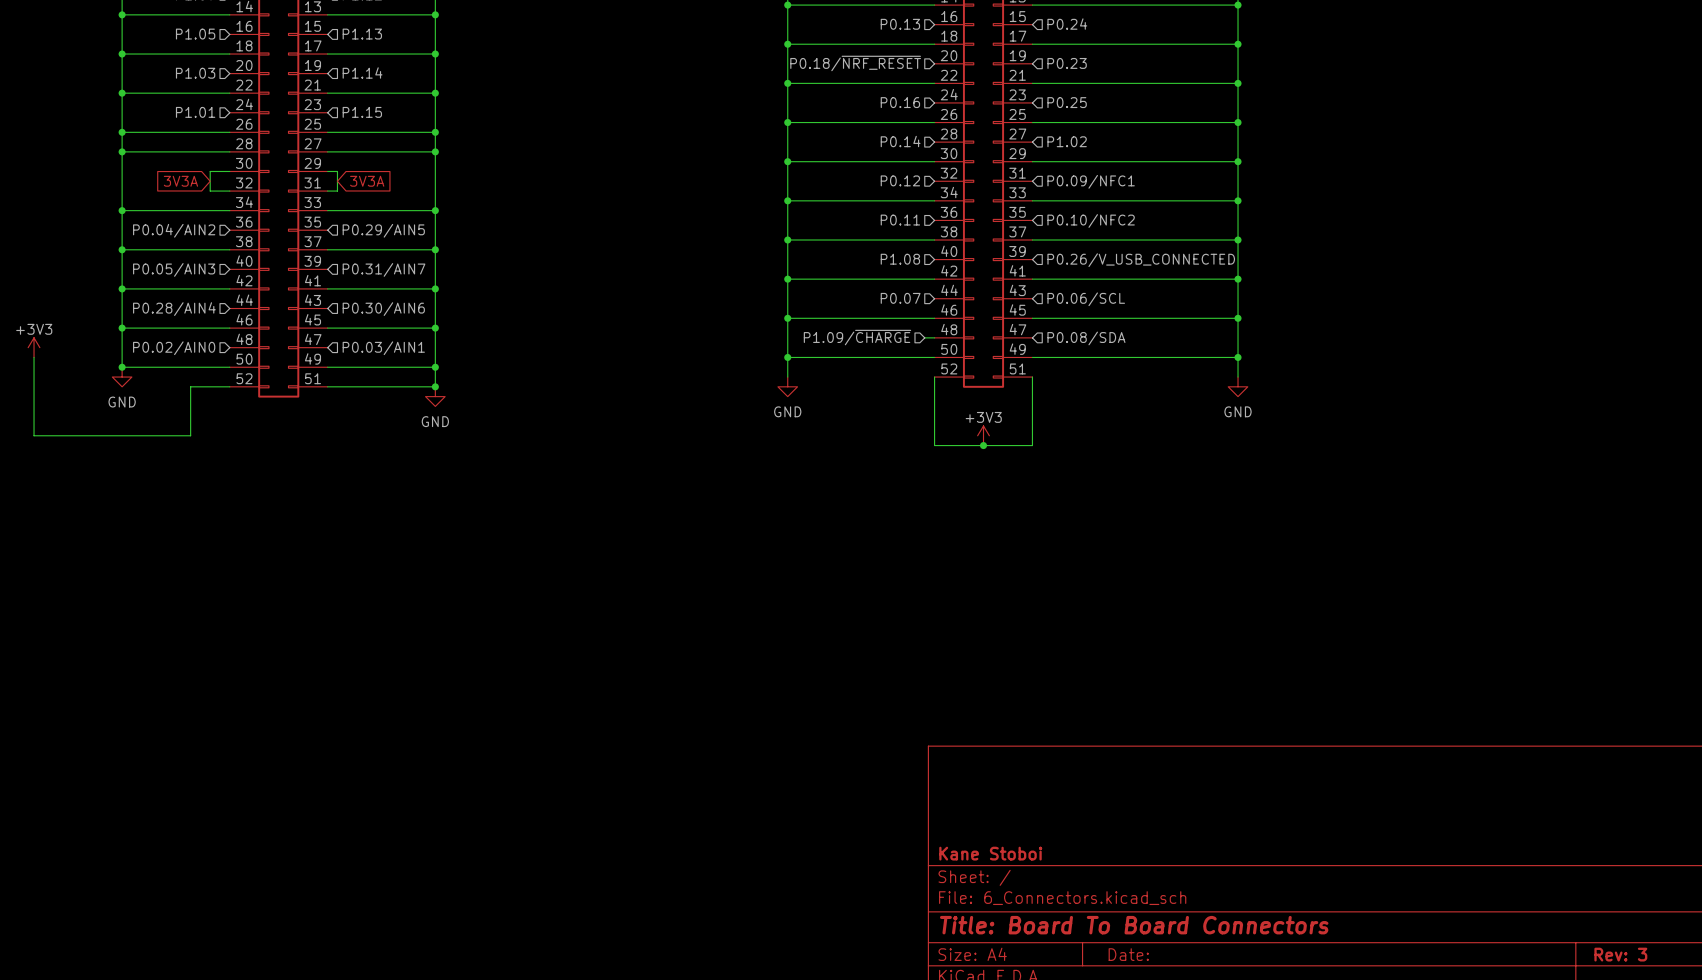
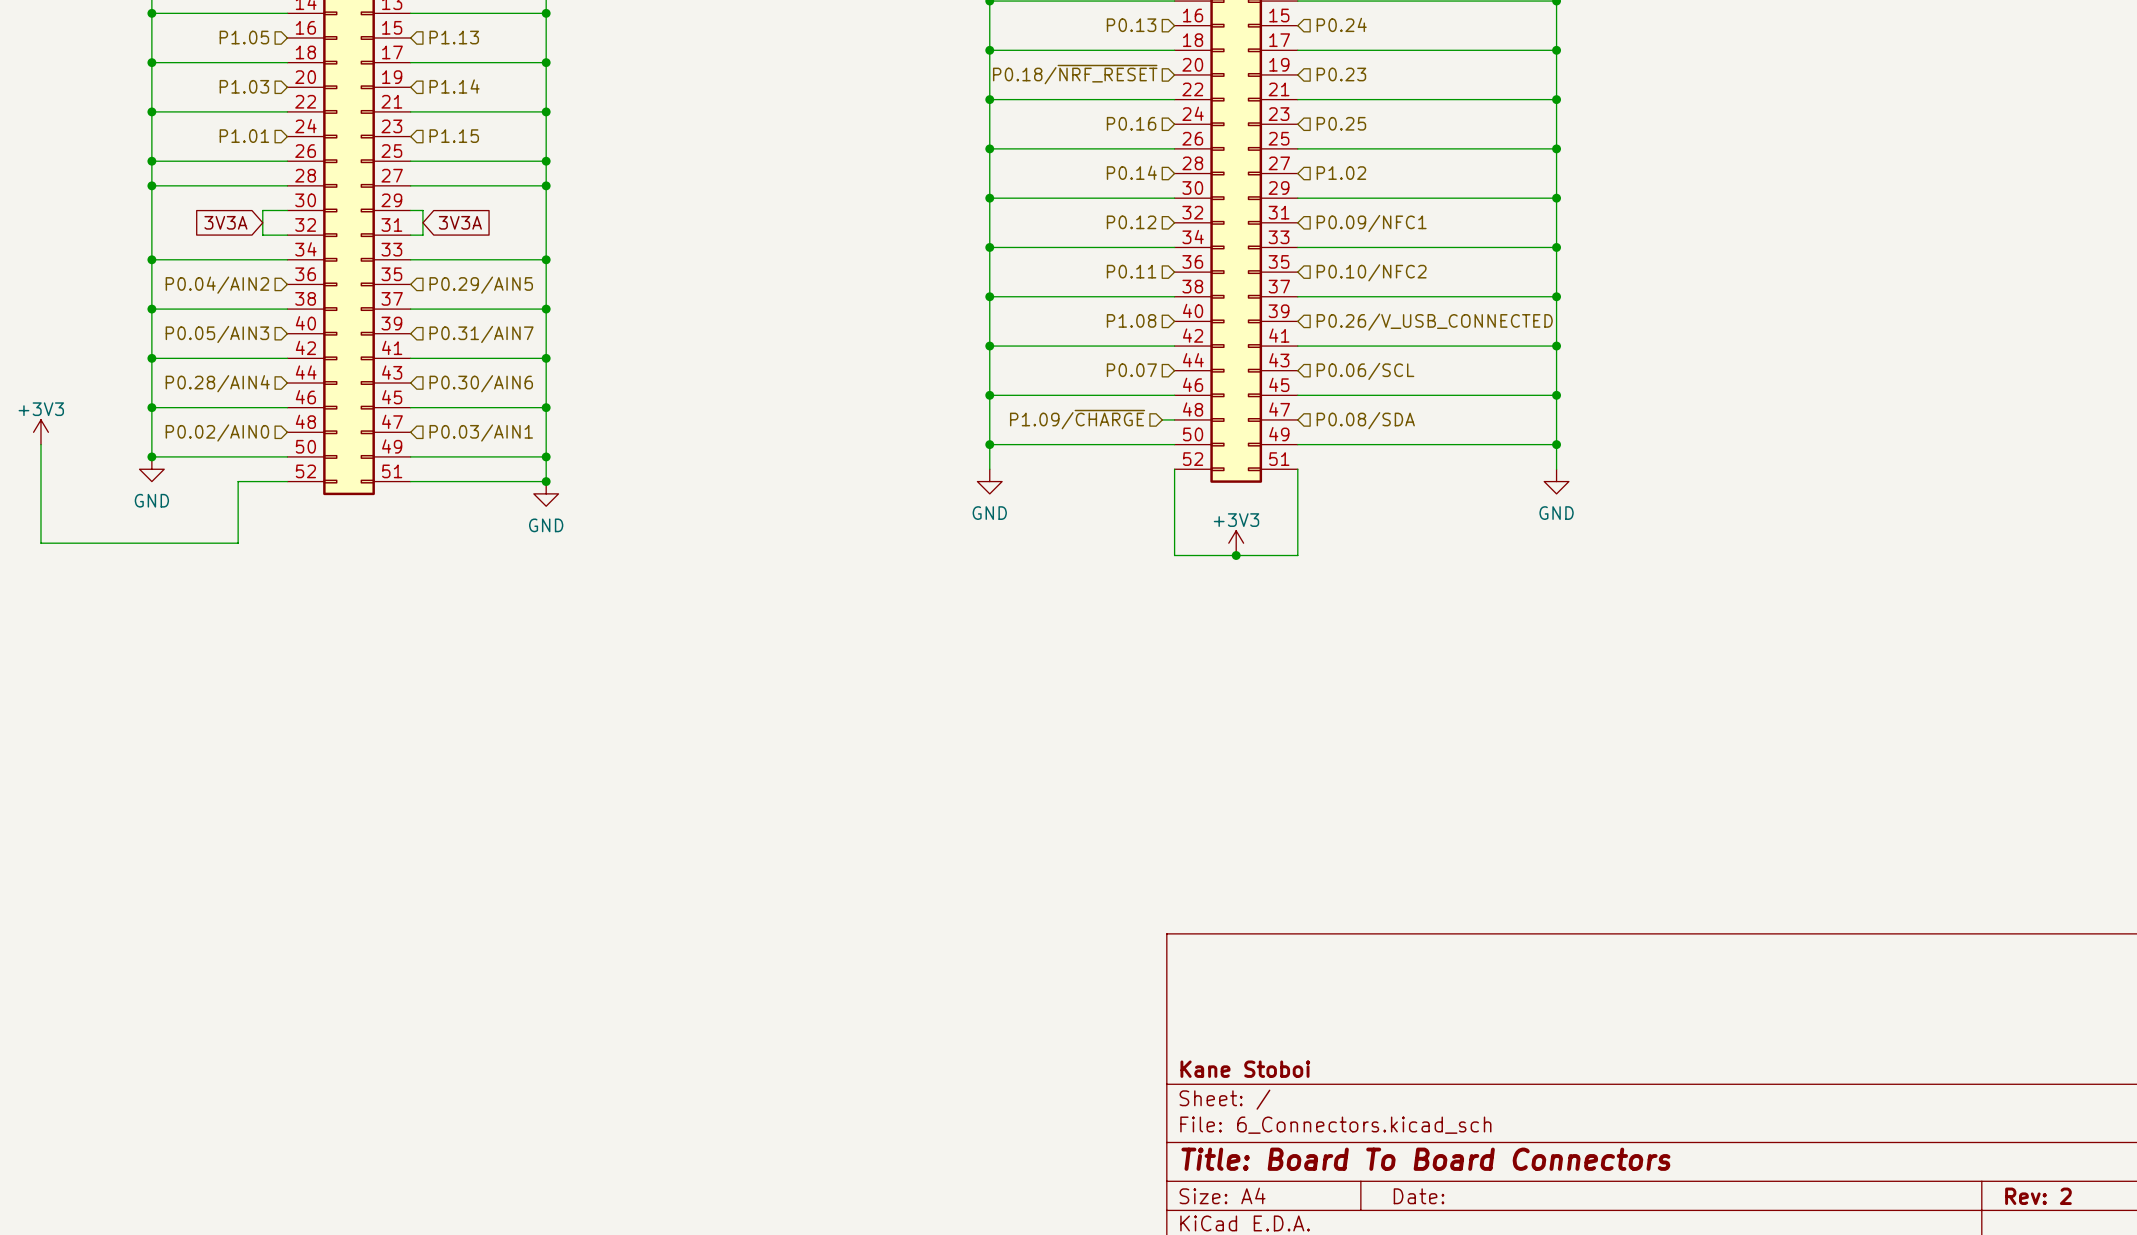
title block: Rev: 3 (1620, 954) -> Rev: 2 (2038, 1196)

